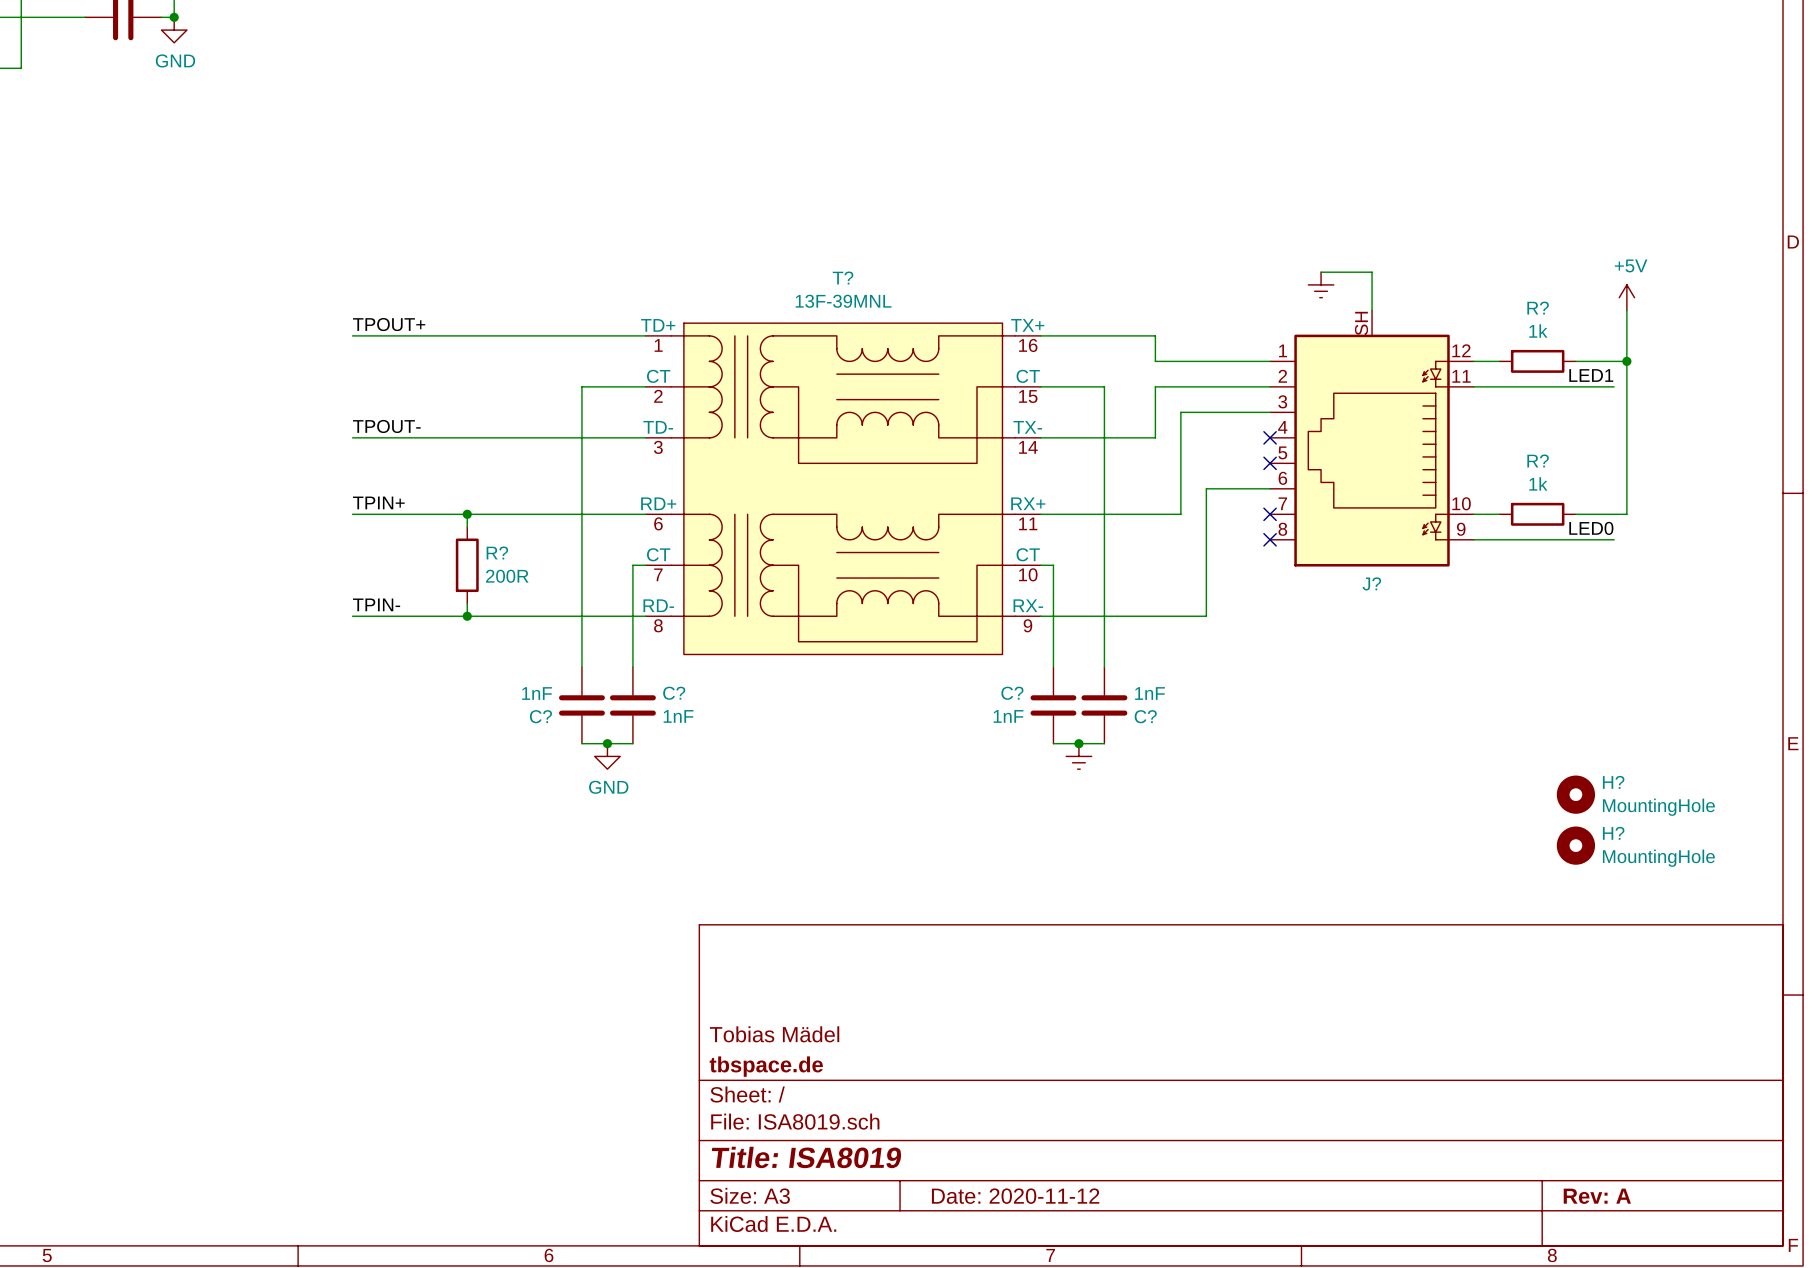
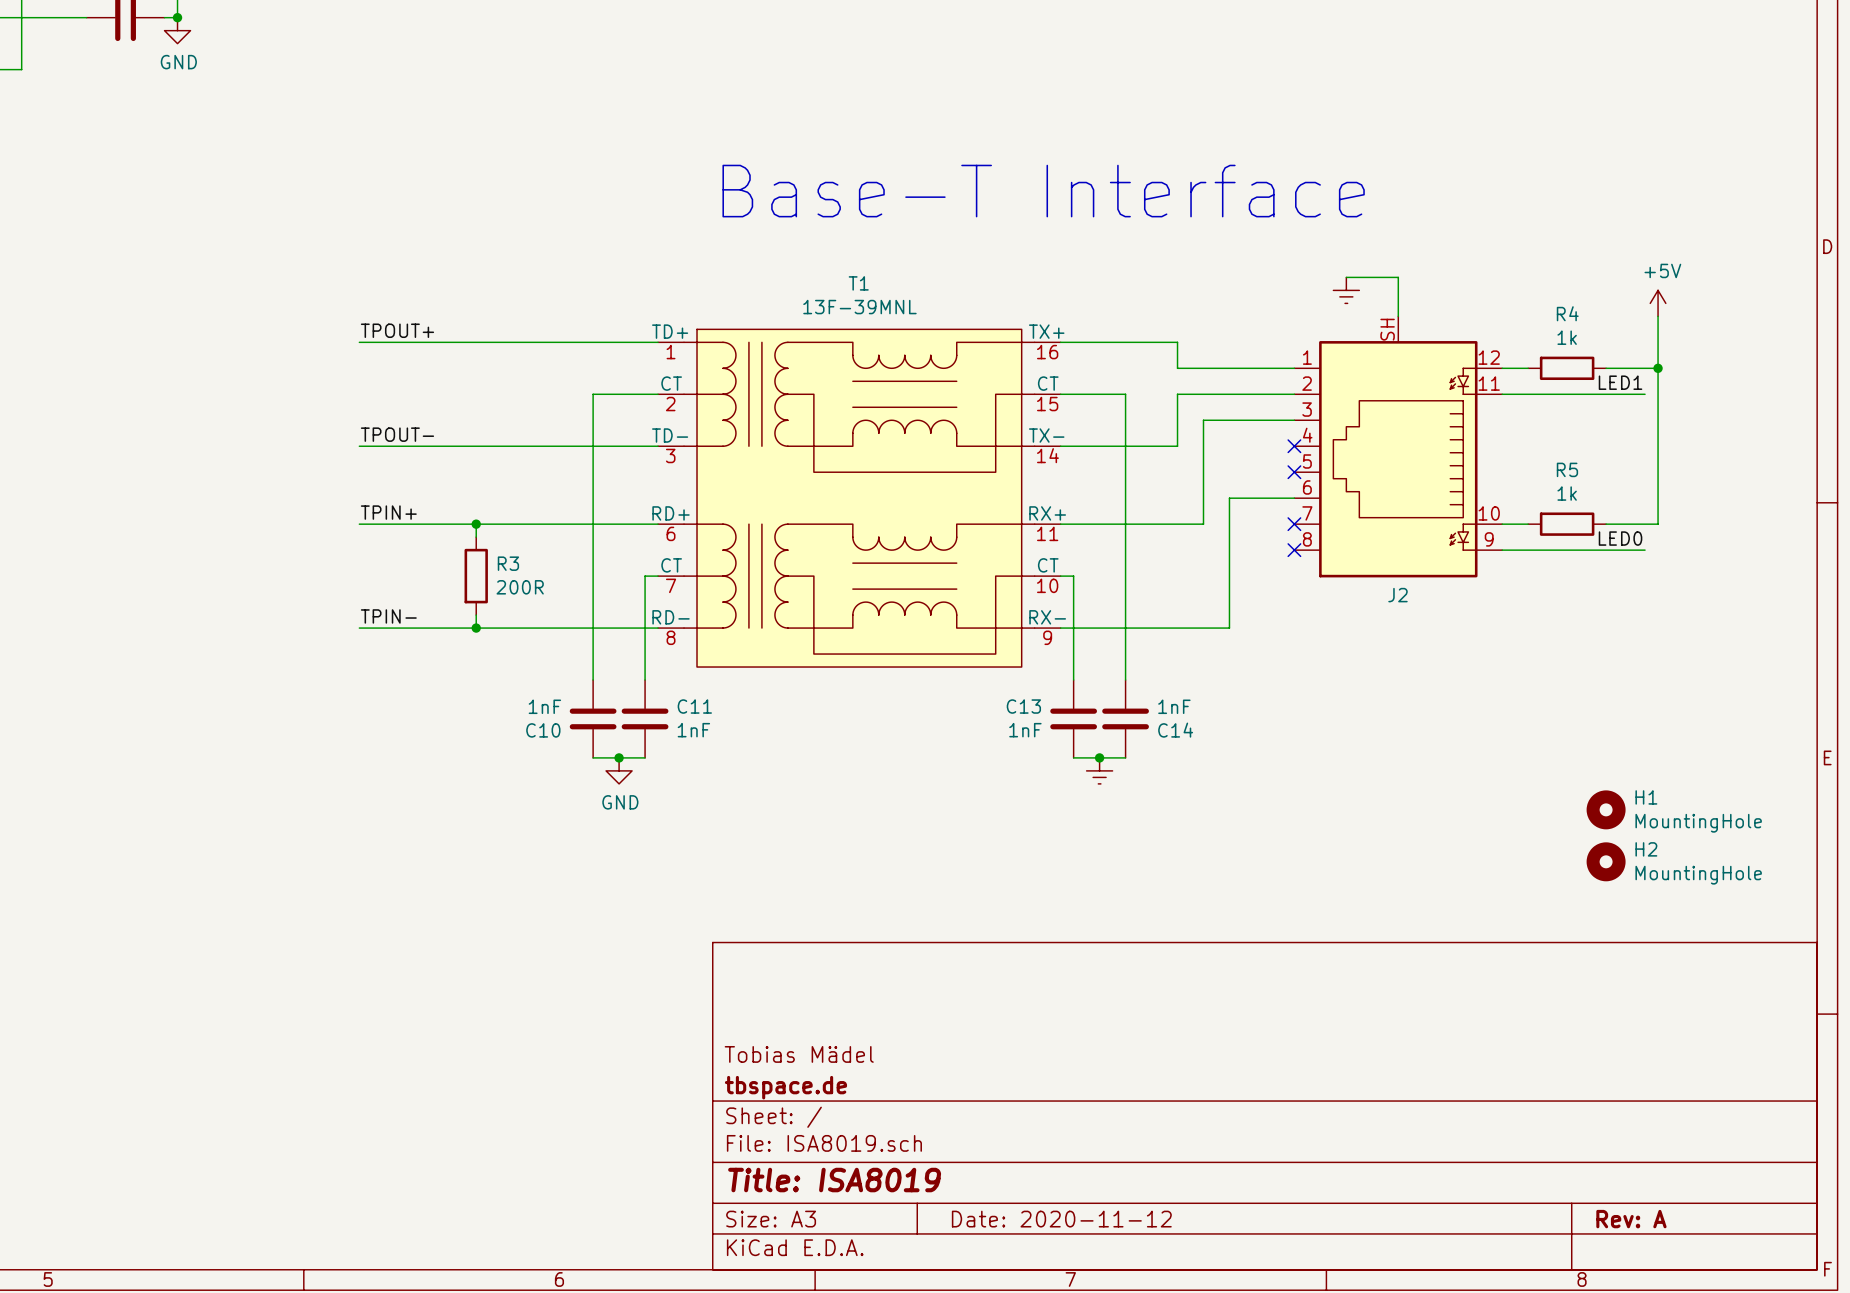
text: none -> Base-T Interface (1043, 191)
T? name: T? (843, 277) -> T1 (858, 283)
R? name: R? (1538, 308) -> R4 (1567, 313)
R? name: R? (1538, 460) -> R5 (1567, 469)
R? name: R? (497, 552) -> R3 (508, 563)
J? name: J? (1371, 583) -> J2 (1397, 595)
C? name: C? (674, 693) -> C11 (694, 706)
C? name: C? (1012, 693) -> C13 (1023, 706)
C? name: C? (540, 716) -> C10 (543, 730)
C? name: C? (1145, 716) -> C14 (1175, 730)
H? name: H? (1613, 782) -> H1 (1646, 797)
H? name: H? (1613, 833) -> H2 (1646, 849)

